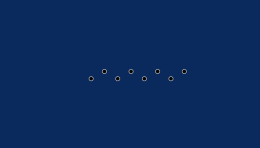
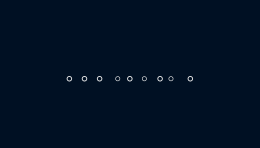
via: (104, 71) -> none
via: (131, 71) -> none
via: (157, 71) -> none
via: (184, 71) -> none
via: none -> (69, 78)
via: none -> (84, 78)
via: (91, 78) -> none
via: none -> (99, 78)
via: none -> (129, 78)
via: none -> (160, 78)
via: none -> (190, 78)

